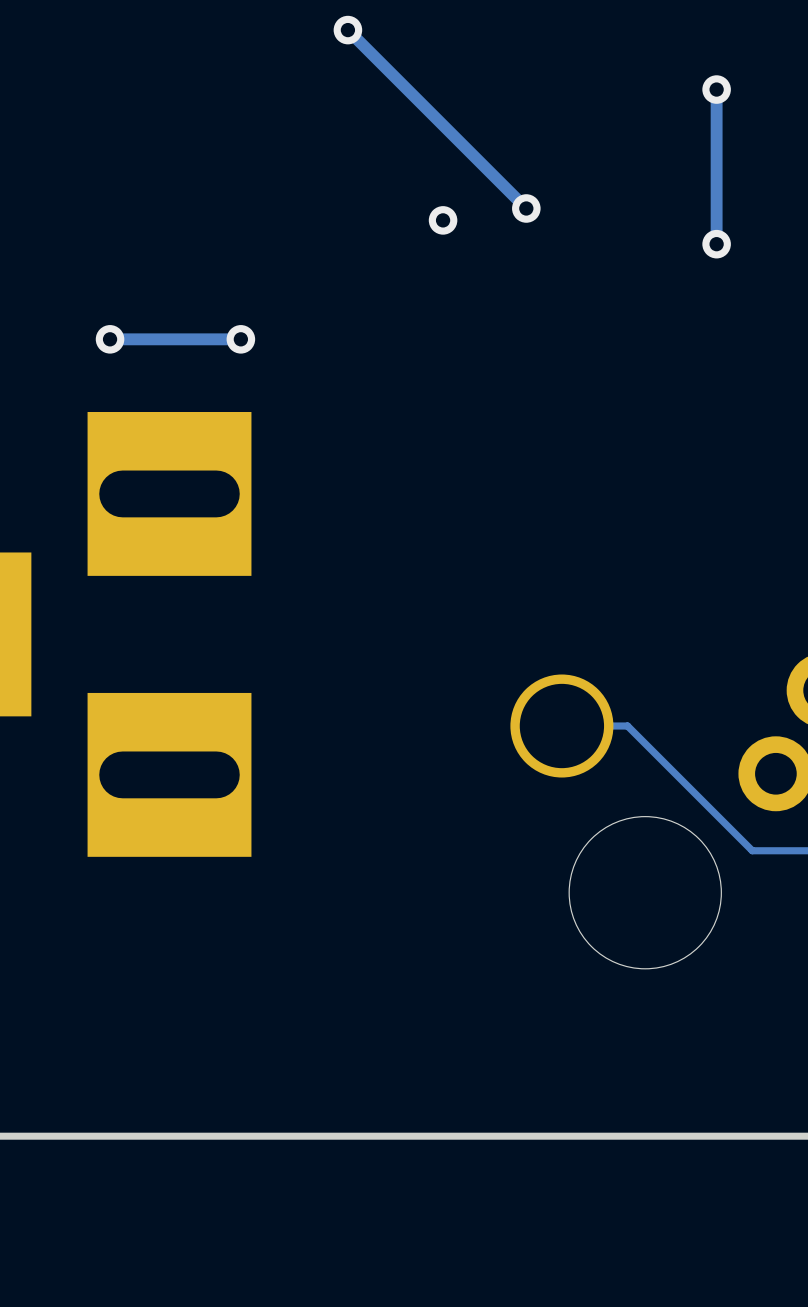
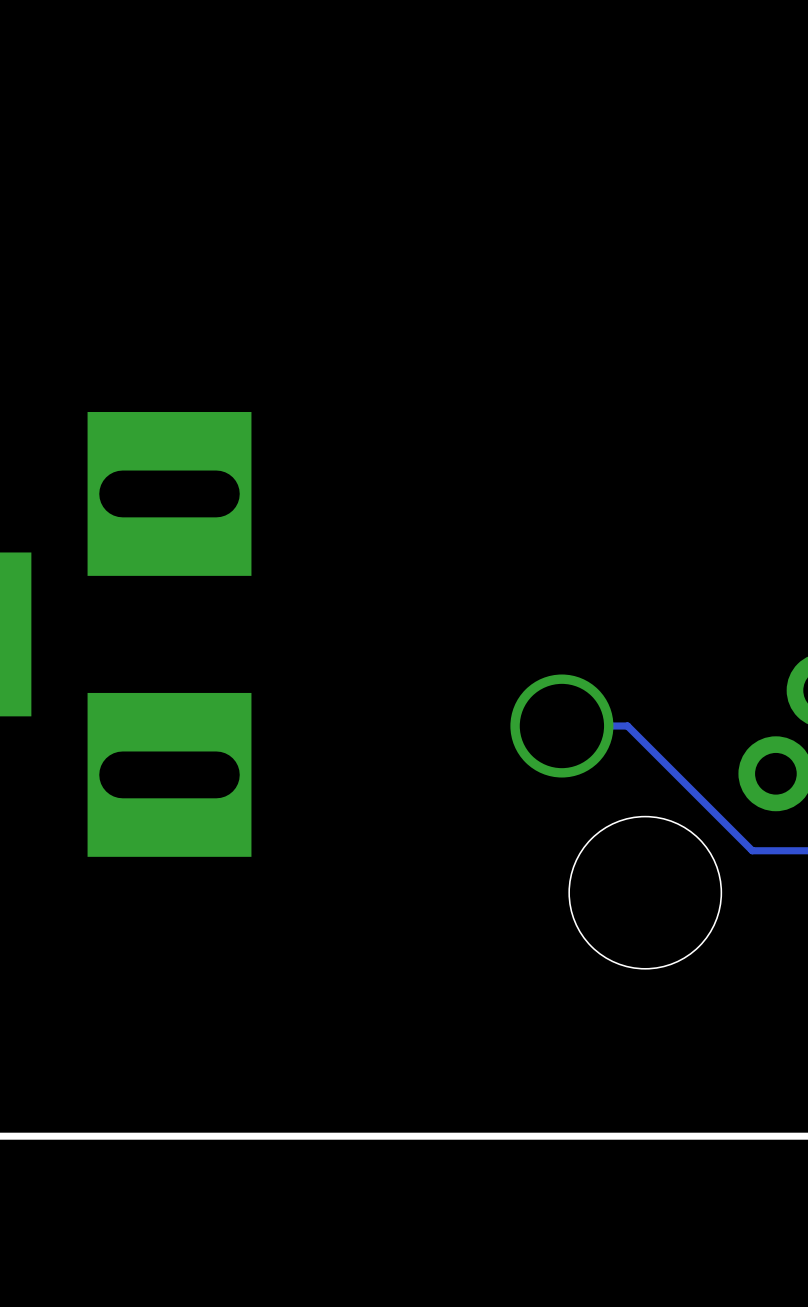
track: (347, 30) (526, 208) -> none
via: (347, 30) -> none
track: (716, 89) (716, 244) -> none
via: (716, 89) -> none
via: (526, 208) -> none
via: (443, 220) -> none
via: (716, 244) -> none
via: (110, 339) -> none
track: (240, 339) (110, 339) -> none
via: (240, 339) -> none

